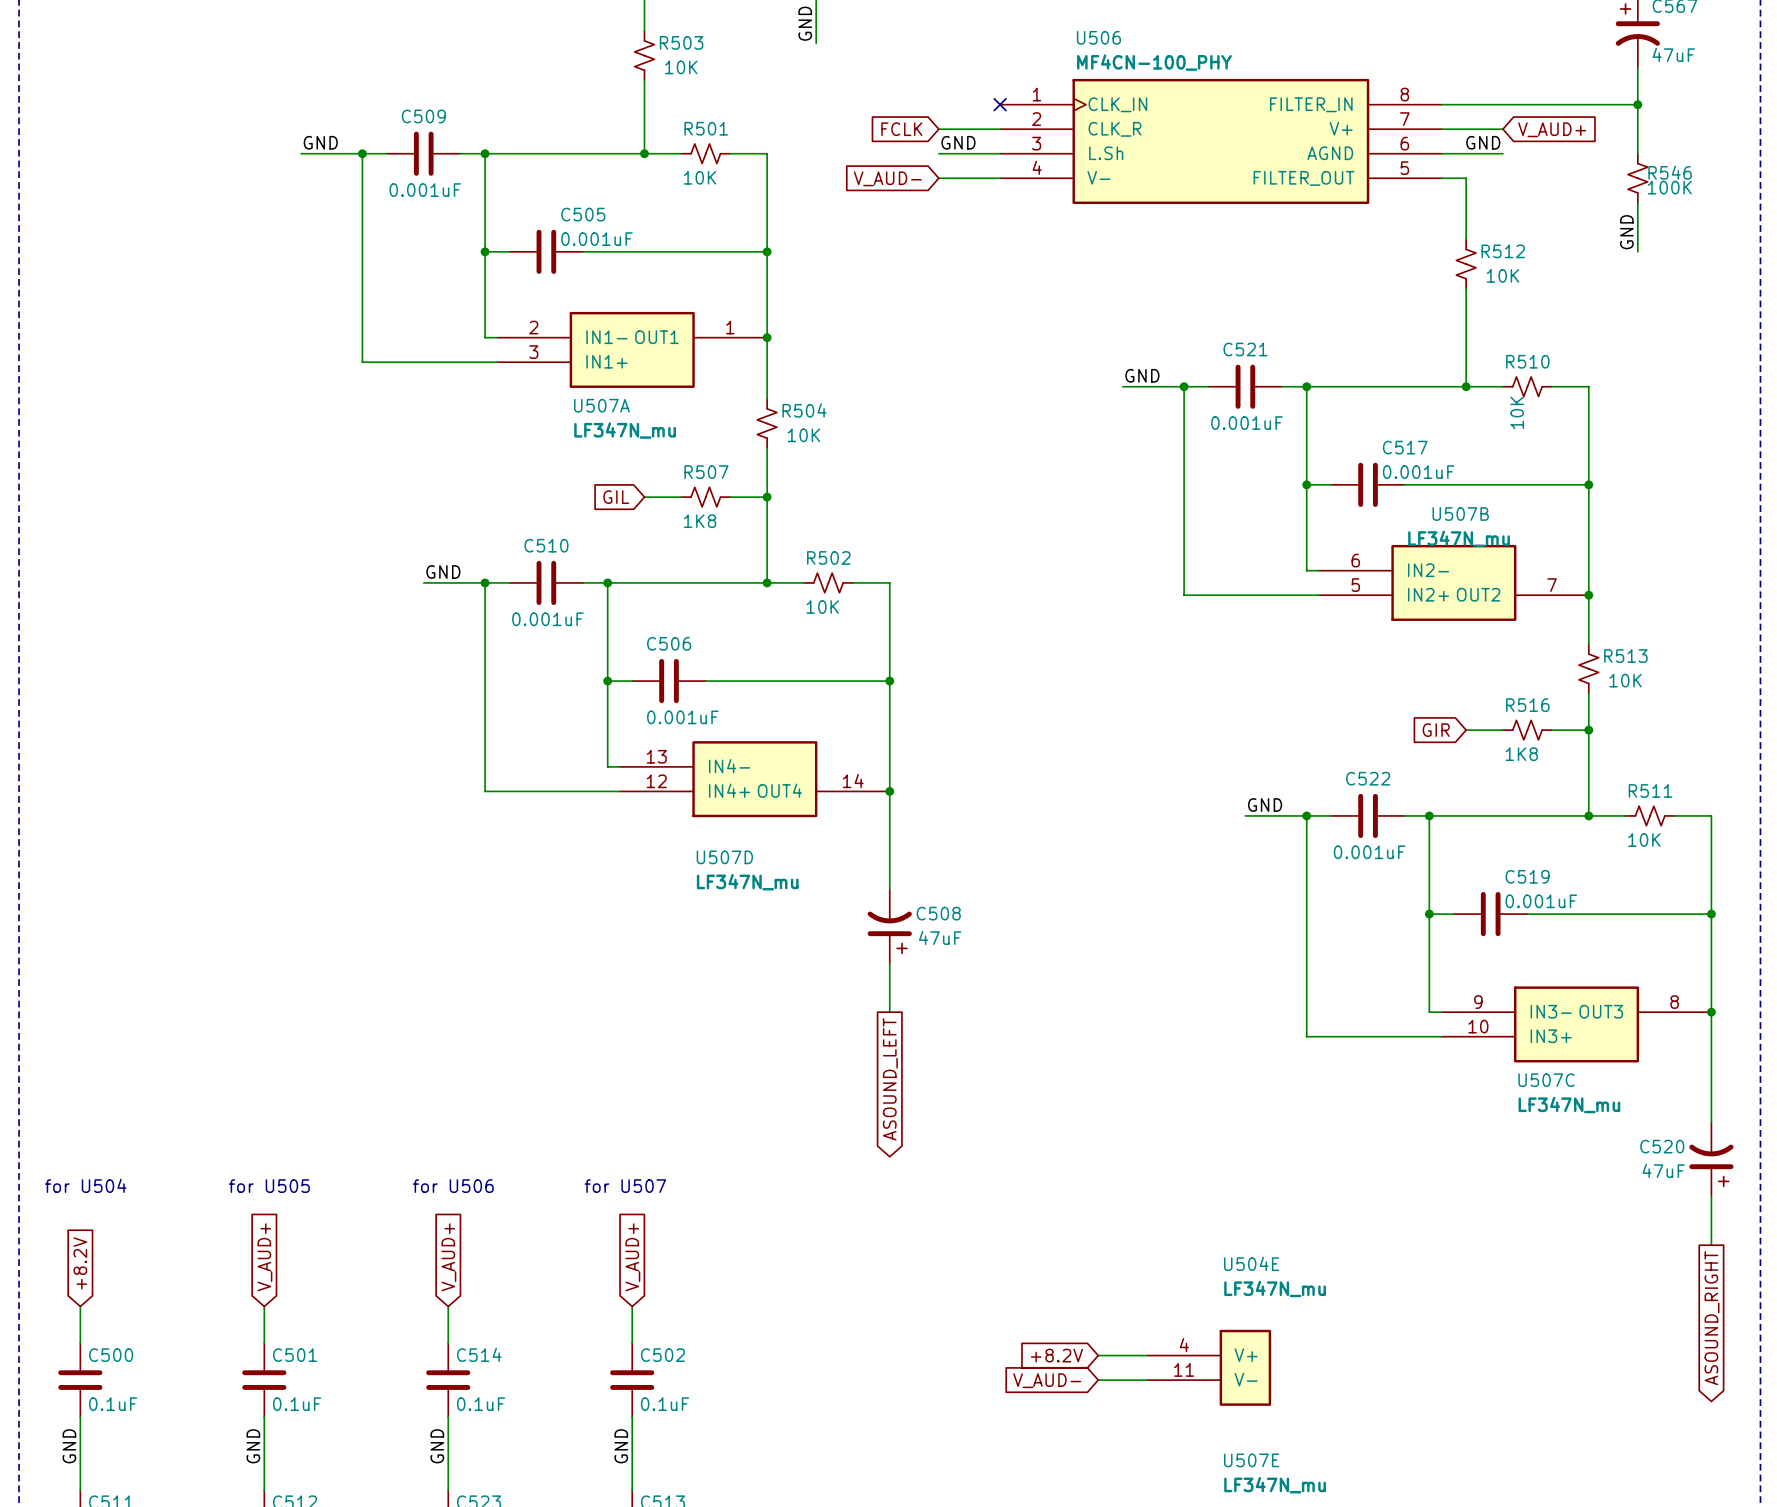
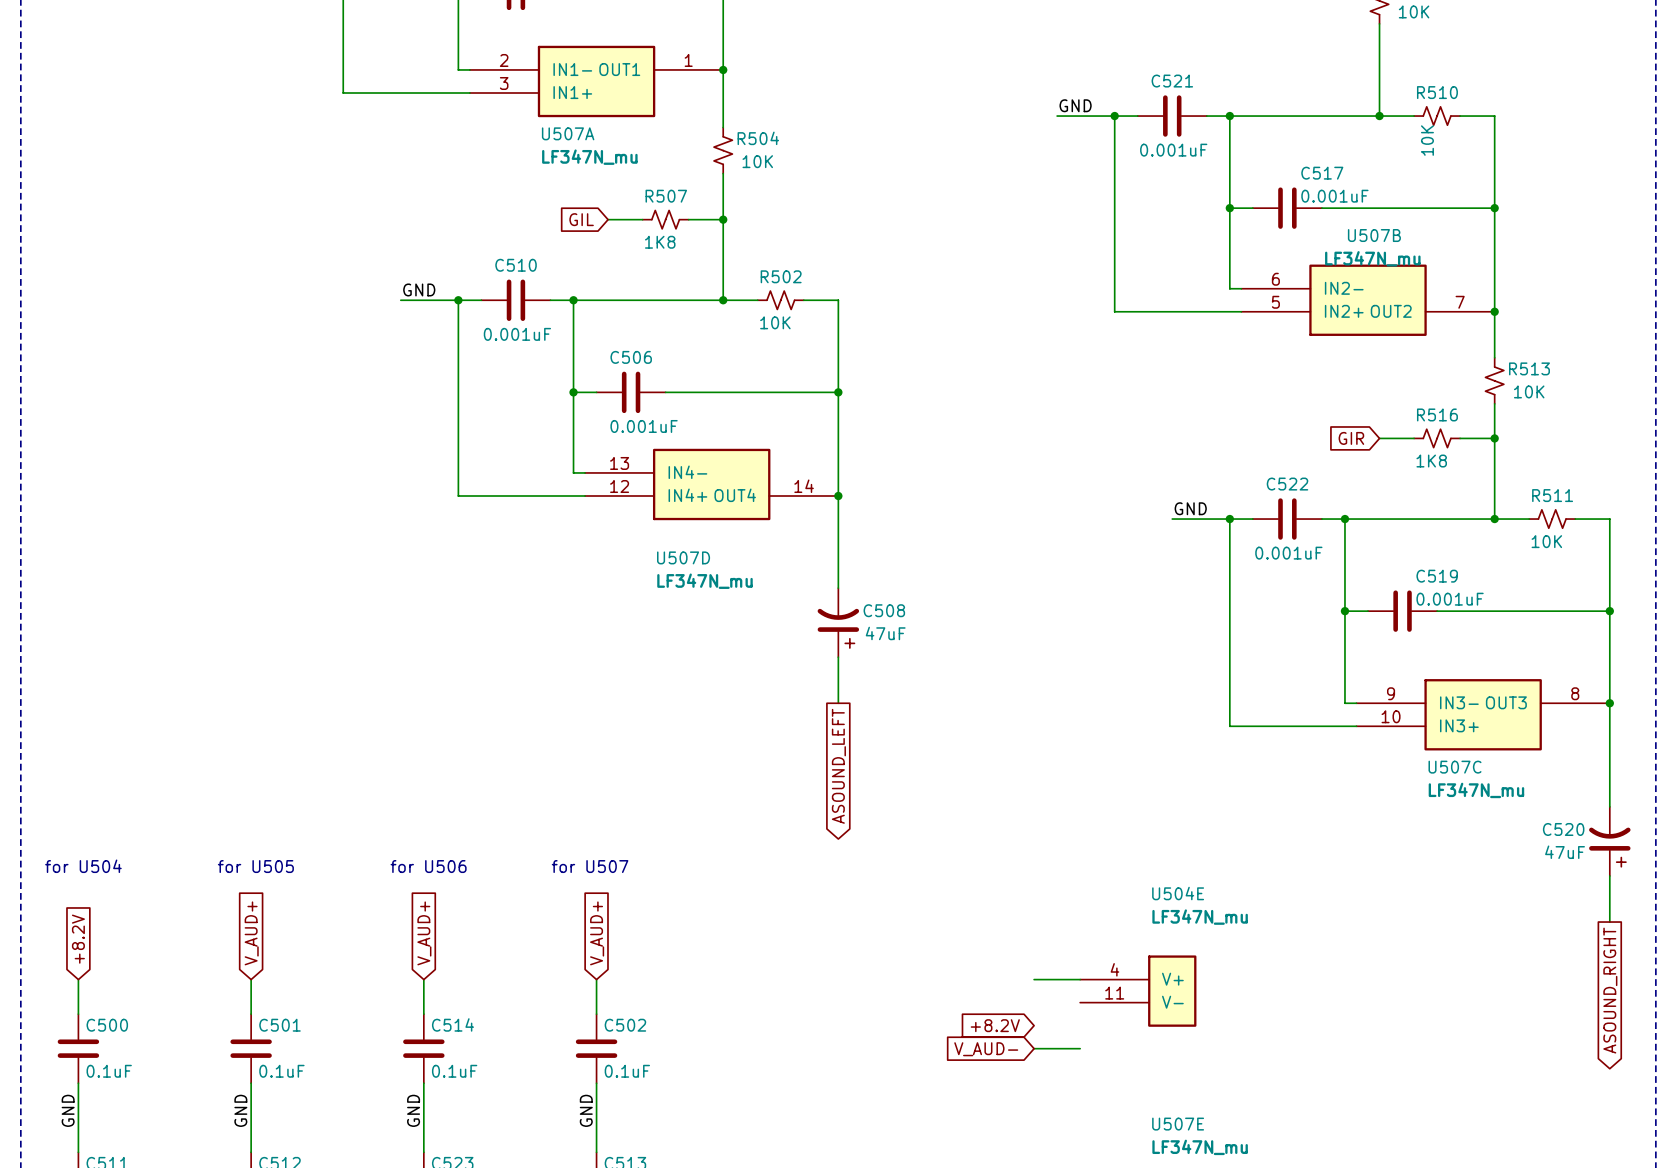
wire: (1098, 1355) (1147, 1355) -> (1034, 979) (1080, 979)
U504E position: (1209, 1367) -> (1138, 991)

